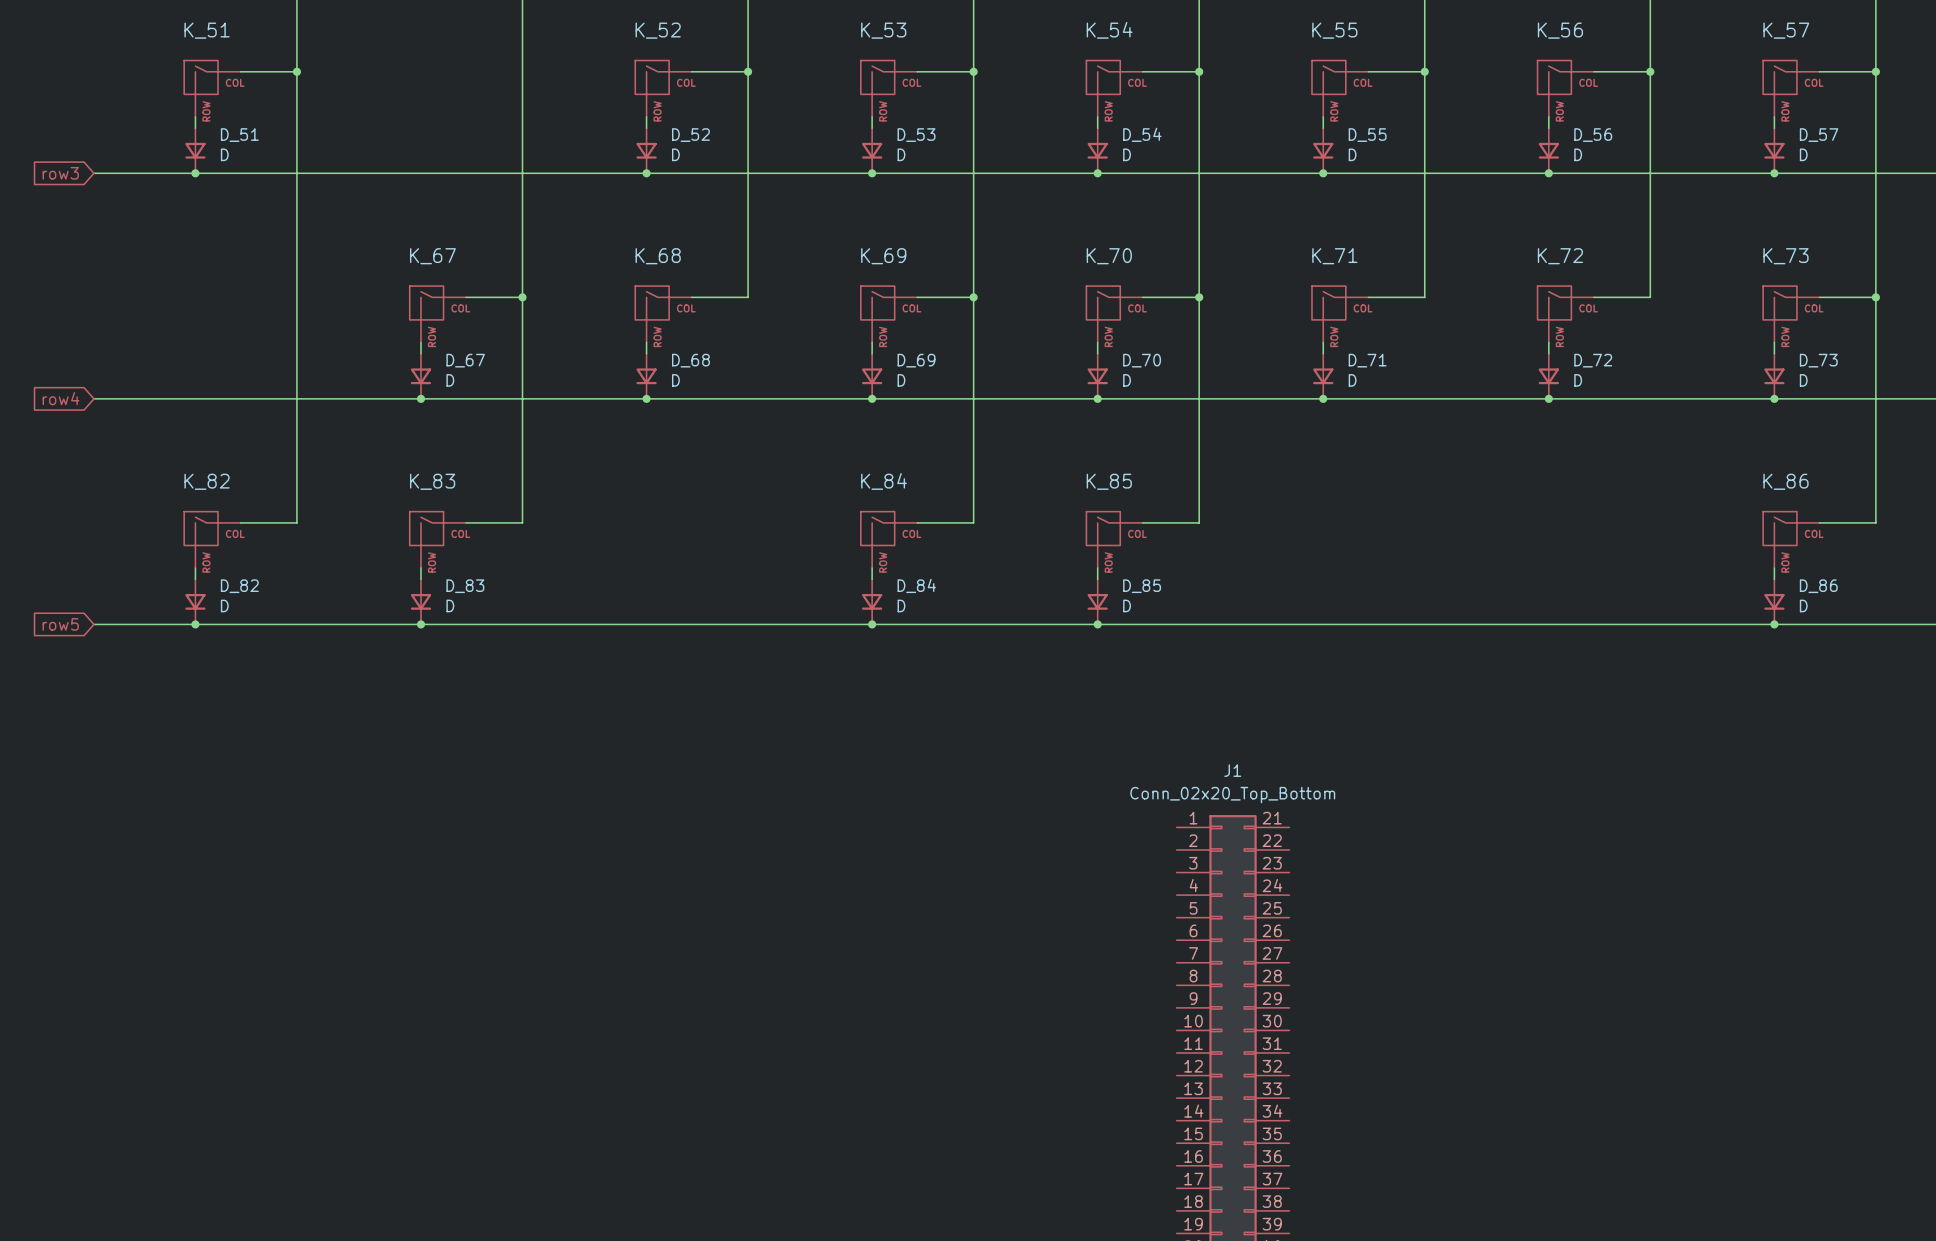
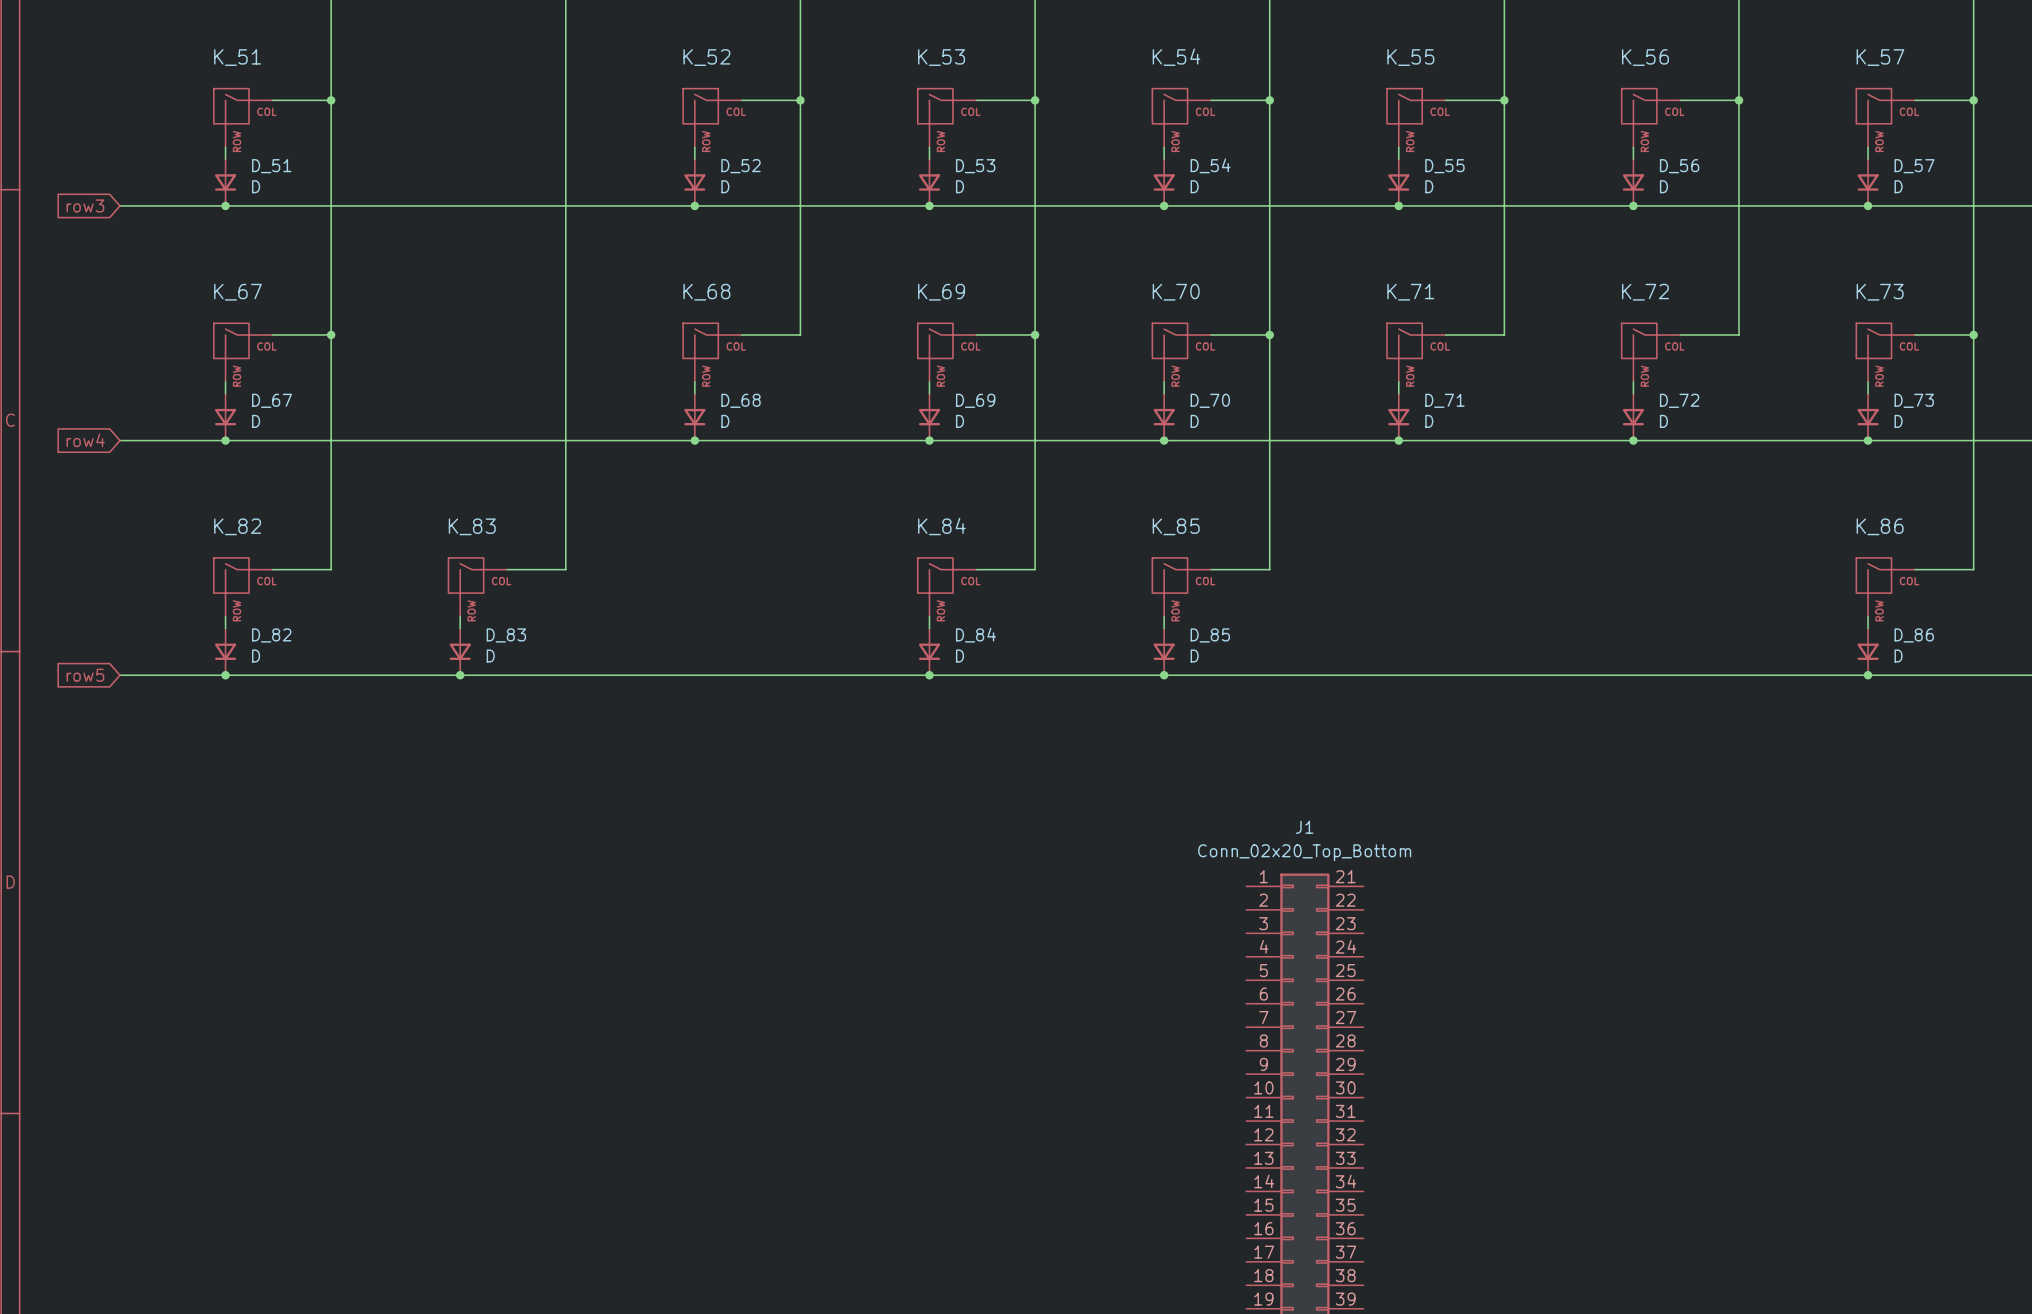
wire: none -> (272, 334) (331, 334)
junction: none -> (331, 334)
wire: (466, 297) (522, 297) -> none
junction: (522, 297) -> none
K_67 position: (437, 314) -> (243, 352)
wire: none -> (225, 381) (225, 393)
wire: (421, 342) (421, 353) -> none
D_67 position: (421, 376) -> (225, 417)
junction: none -> (225, 440)
junction: (421, 398) -> none

